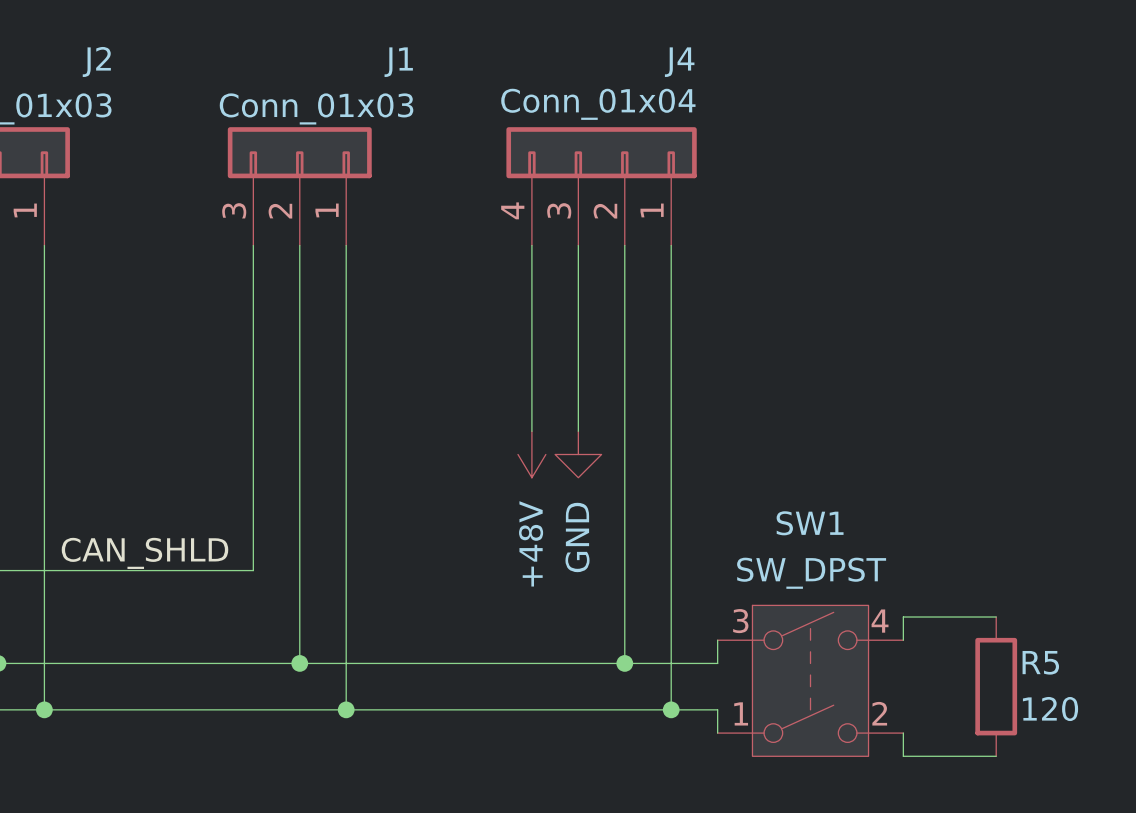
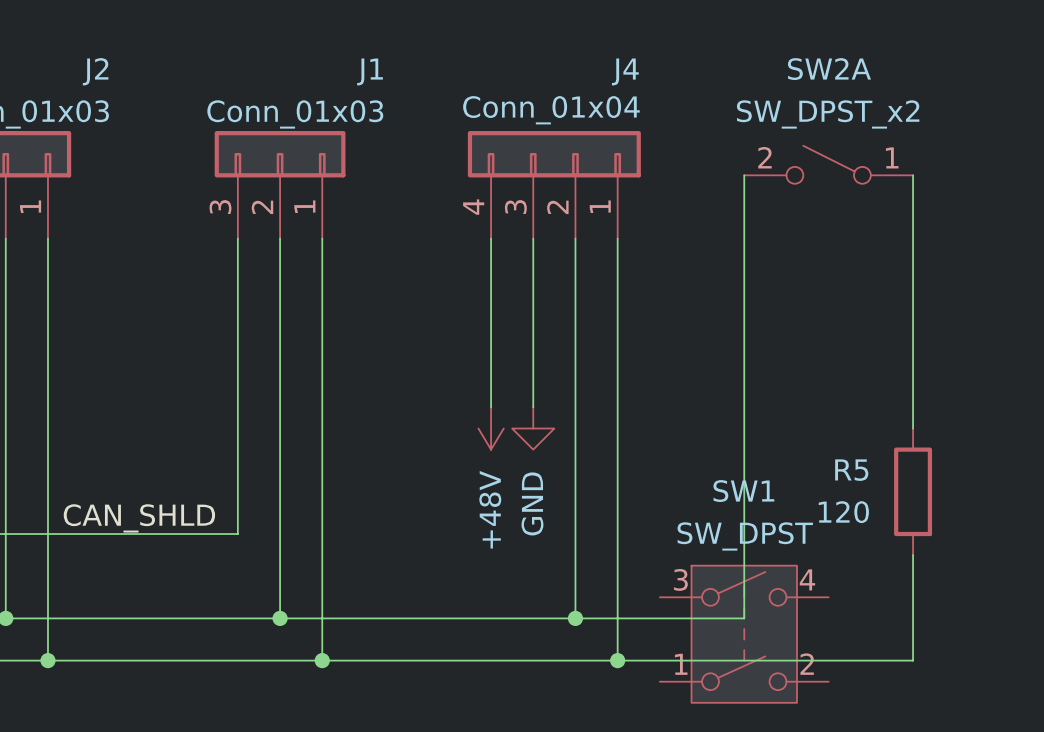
SW2A: none -> SW_DPST_x2 (828, 164)
wire: none -> (913, 175) (913, 428)
wire: (996, 617) (903, 617) (903, 640) -> none
wire: (717, 640) (717, 663) -> (744, 175) (744, 618) (659, 618)
R5 name position: R5 (1040, 662) -> R5 (851, 470)
R5 position: (996, 686) -> (913, 491)
wire: (717, 709) (717, 733) -> (659, 660) (913, 660) (913, 555)
R5 value position: 120 (1050, 709) -> 120 (843, 512)
wire: (903, 733) (903, 756) (996, 756) -> none

